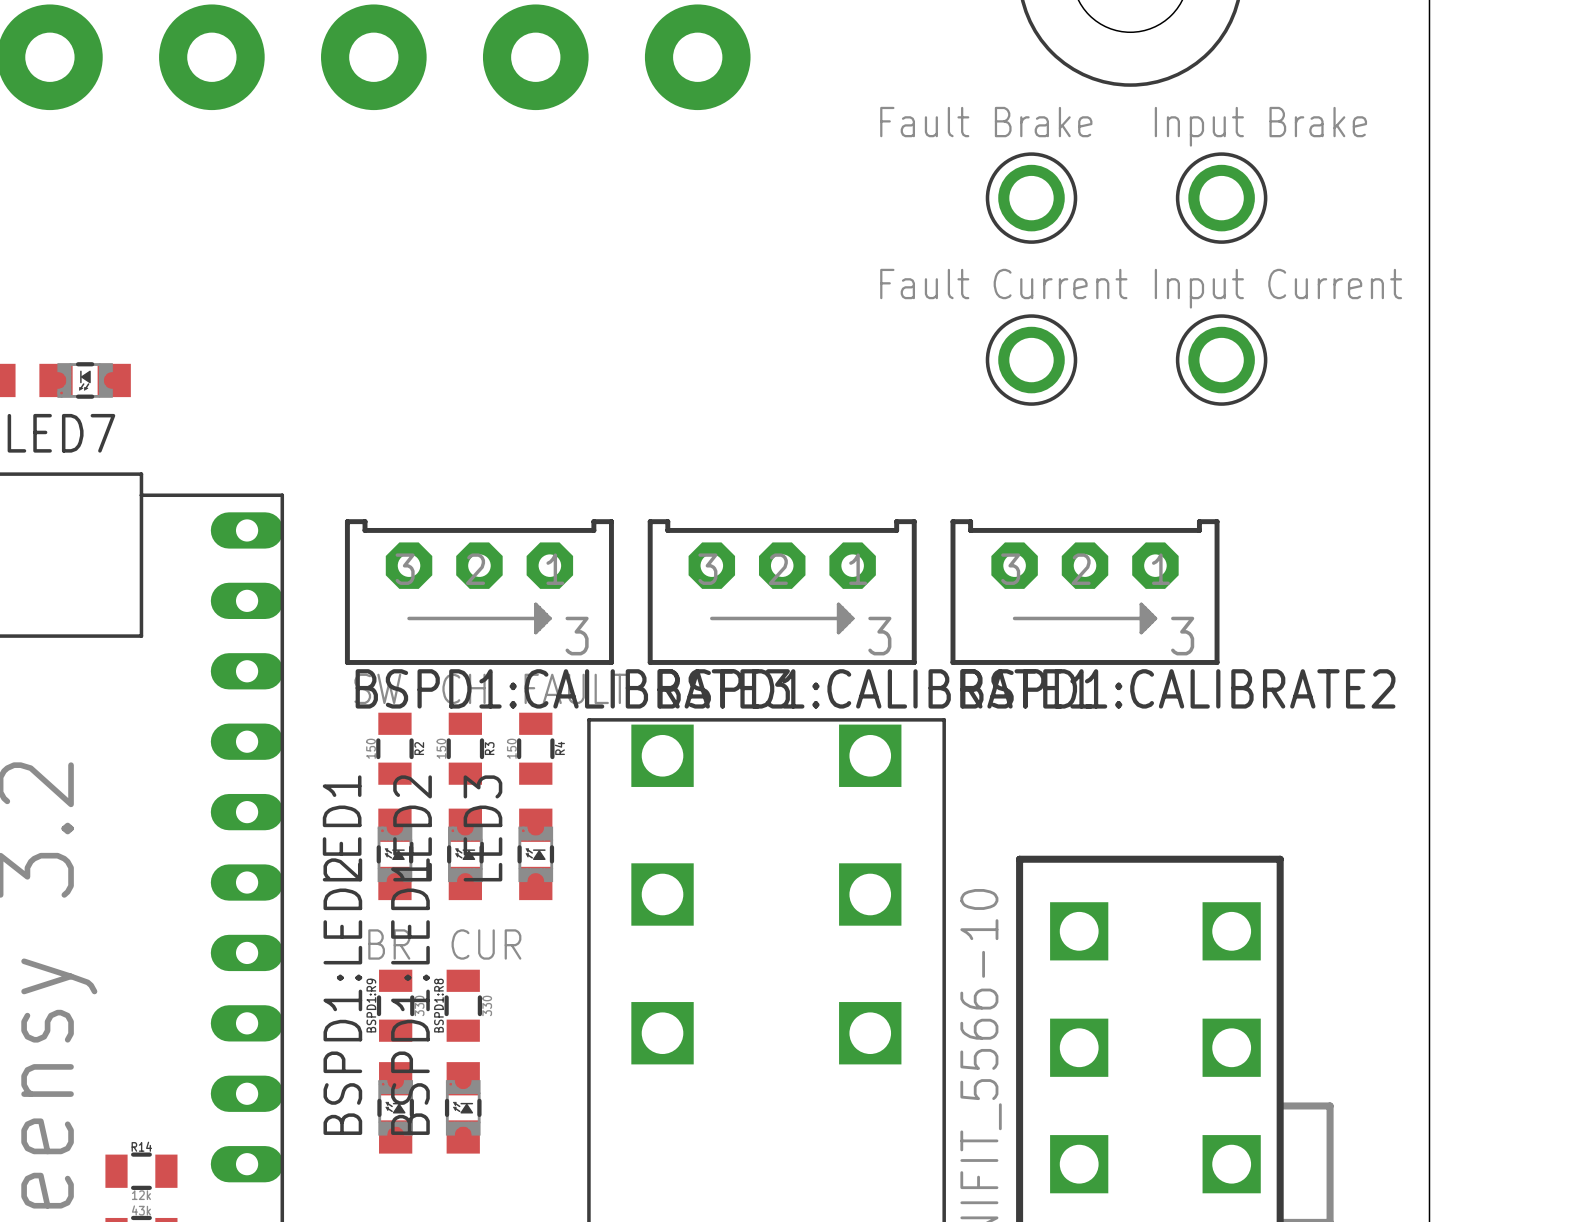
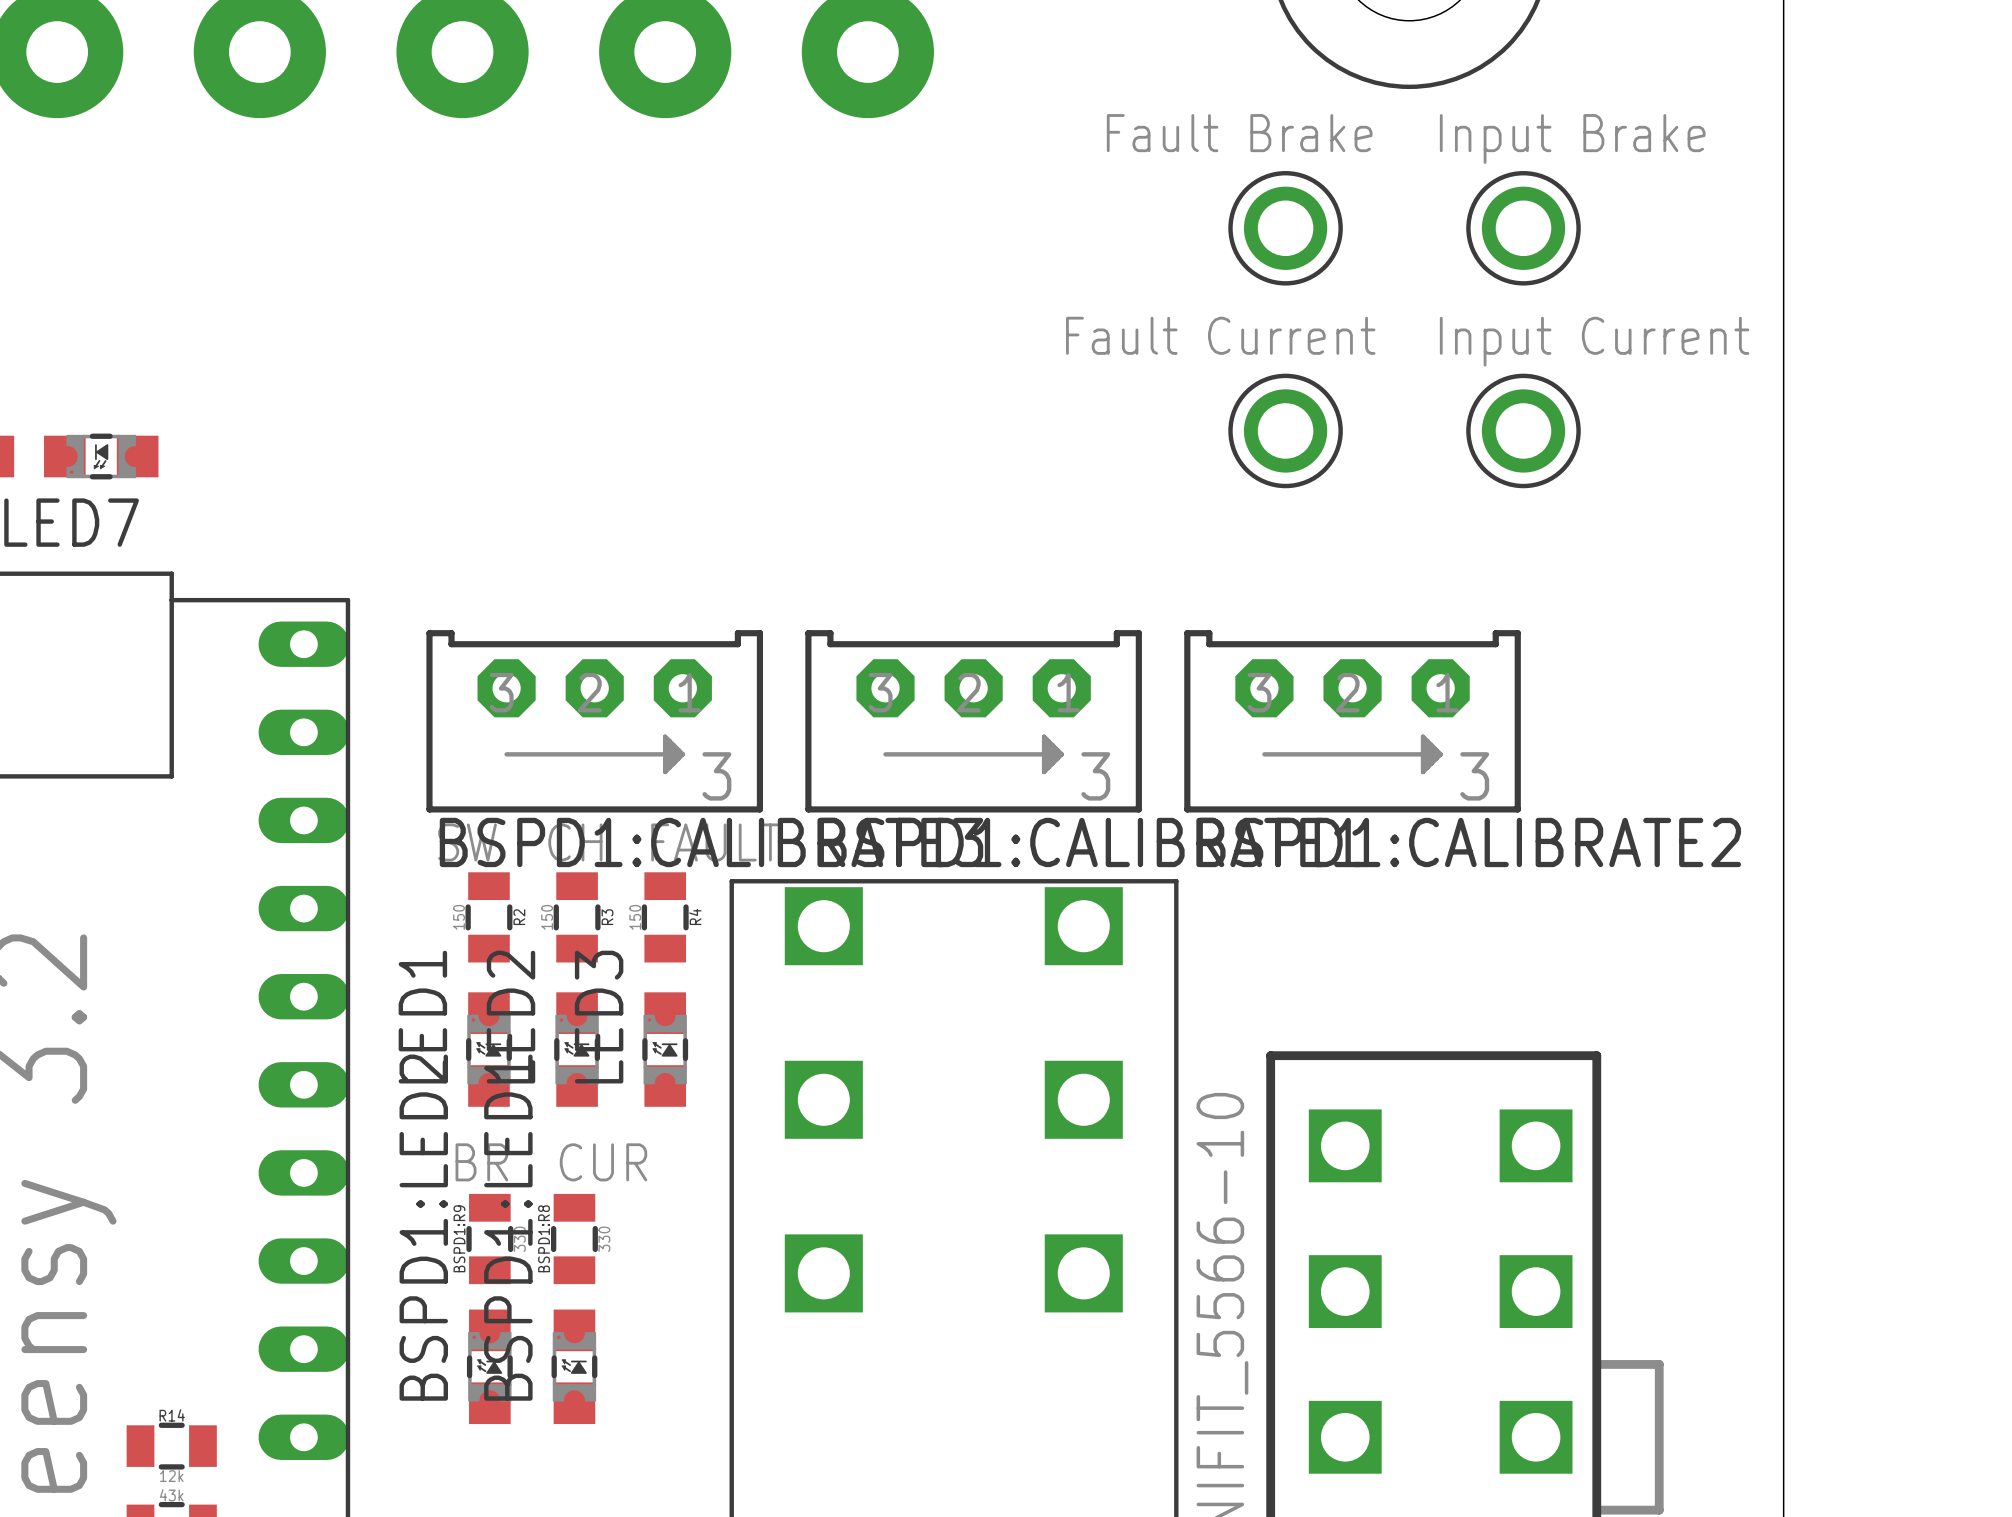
text position: Fault Brake (986, 122) -> Fault Brake (1239, 133)
text position: Fault Current (1003, 284) -> Fault Current (1220, 335)

